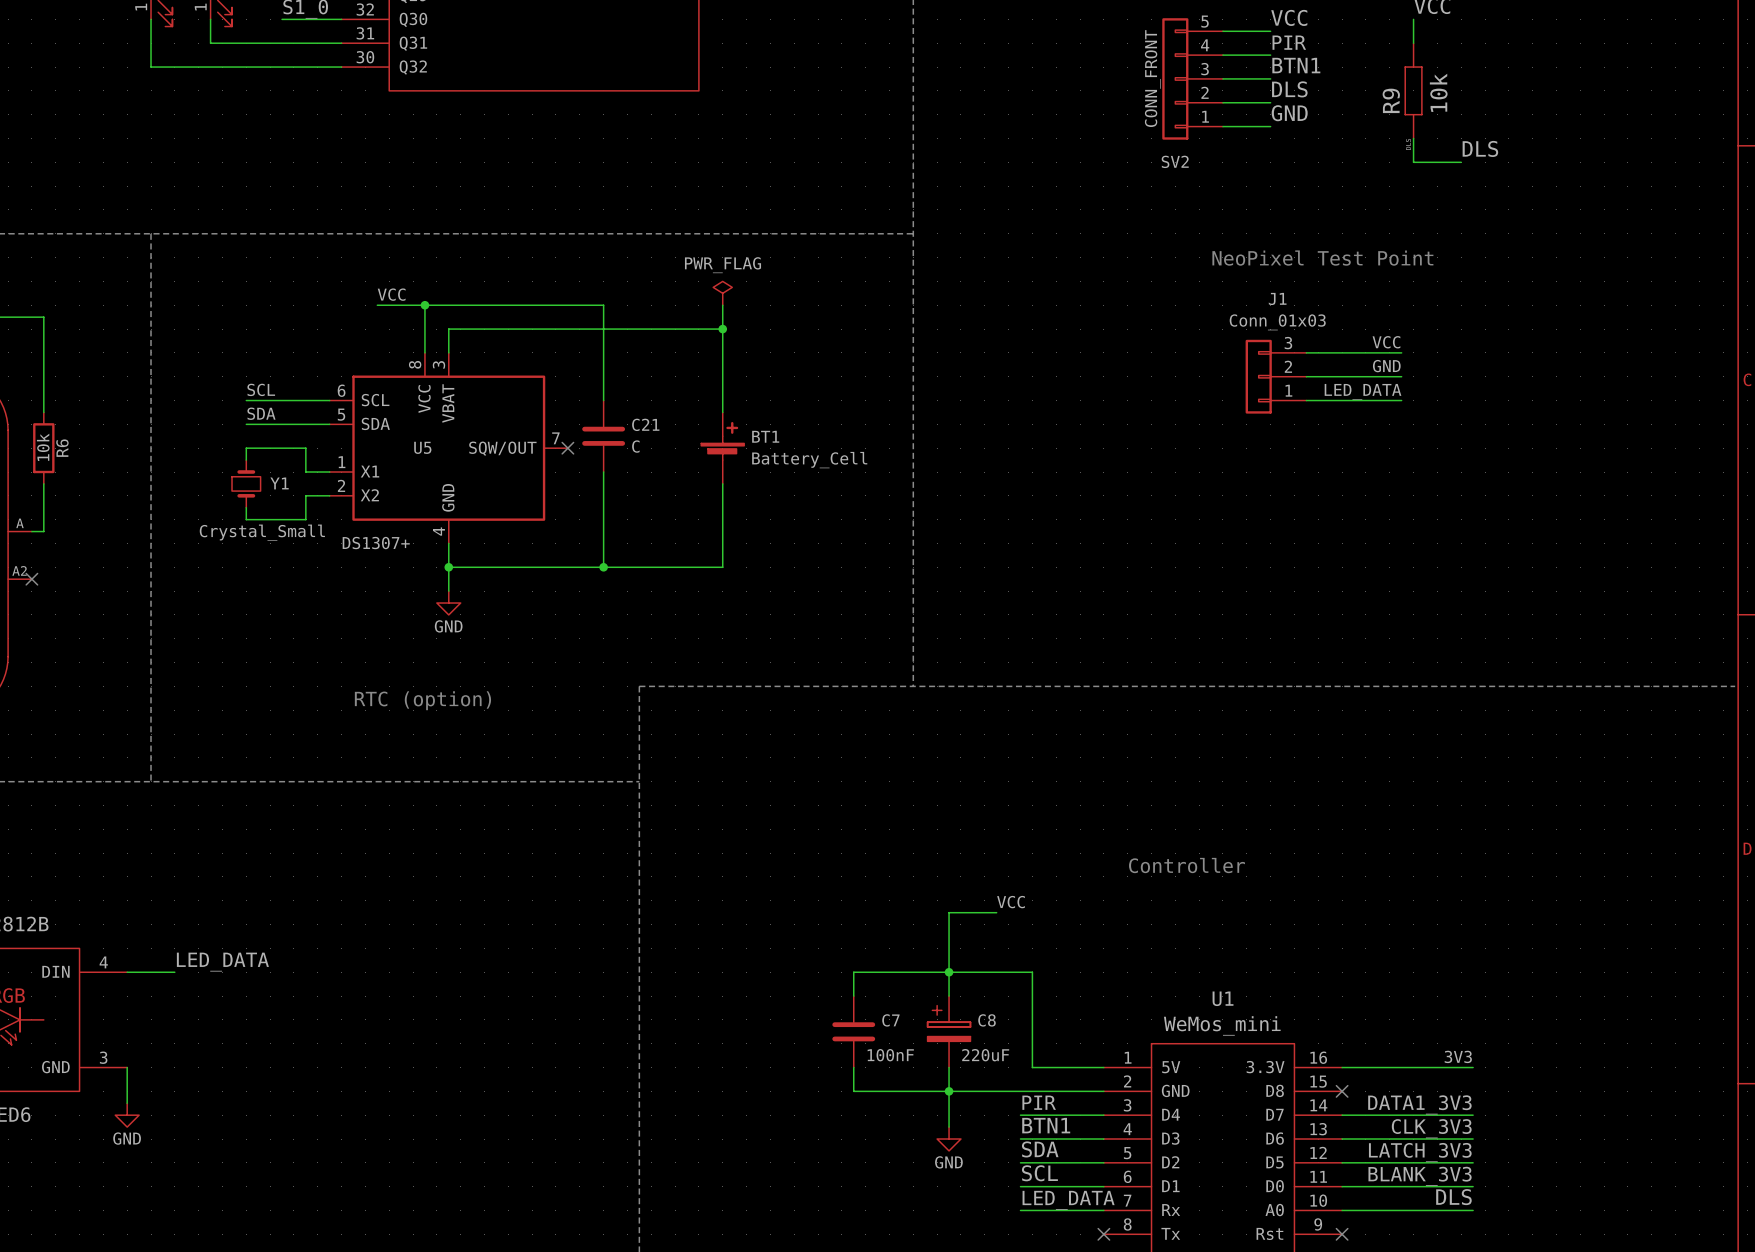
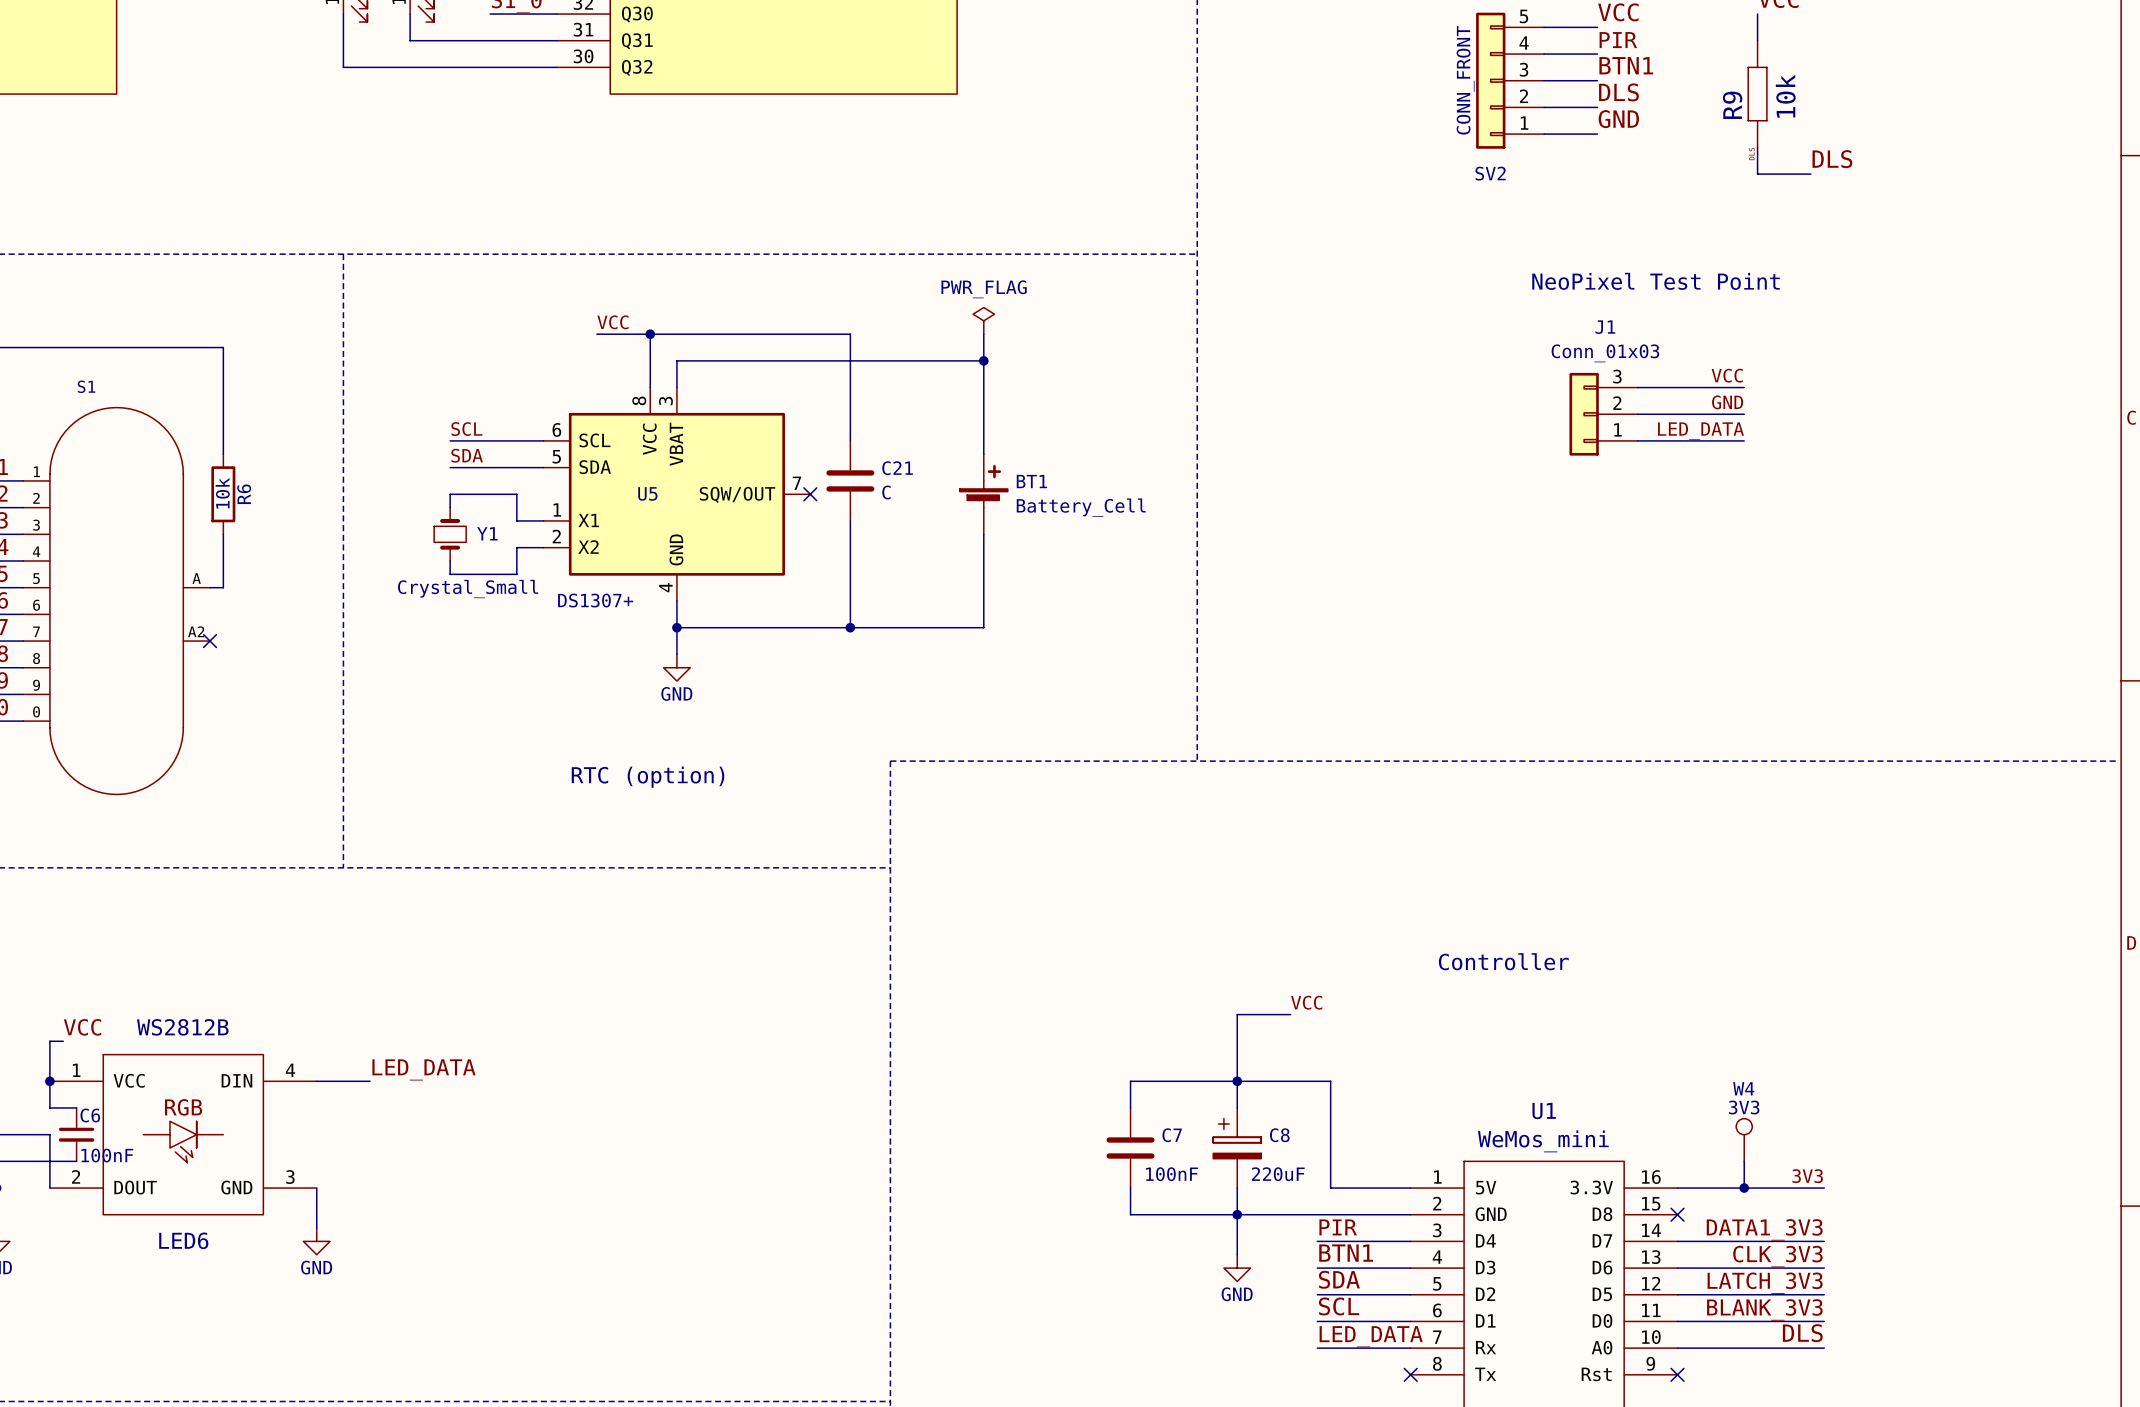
W4: none -> 3V3 (1744, 1140)
wire: none -> (1744, 1161) (1744, 1188)
junction: none -> (1744, 1188)

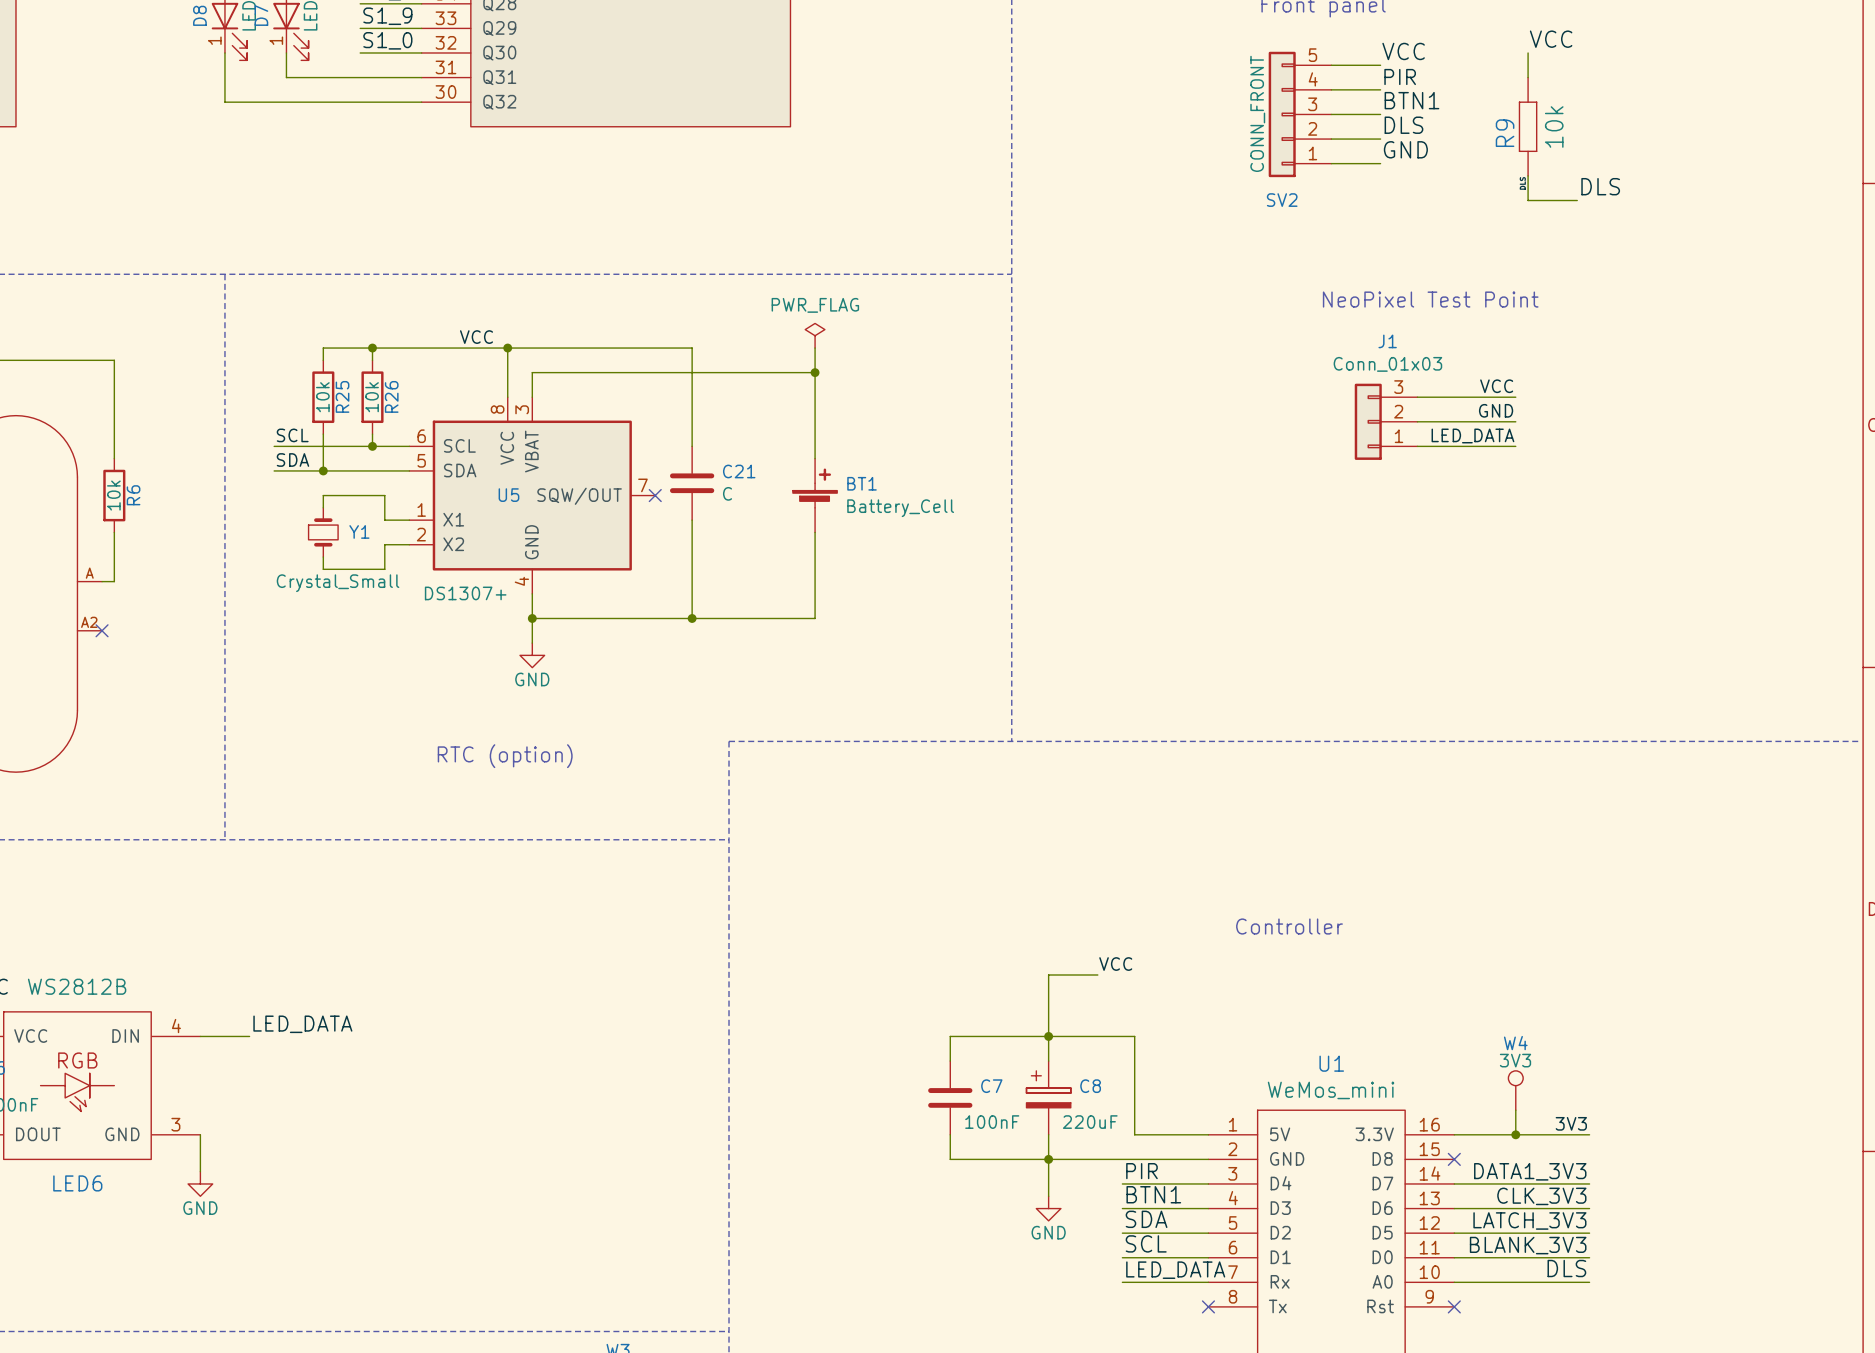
wire: none -> (372, 348) (372, 360)
junction: none -> (372, 348)
wire: none -> (458, 348) (323, 348) (323, 360)
R25: none -> 10k (323, 397)
R26: none -> 10k (372, 397)
wire: none -> (323, 434) (323, 470) (274, 470)
wire: none -> (372, 434) (372, 446)
label position: SCL (466, 429) -> SCL (292, 435)
wire: none -> (274, 446) (323, 446)
junction: none -> (372, 446)
label position: SDA (467, 455) -> SDA (292, 459)
junction: none -> (323, 470)

